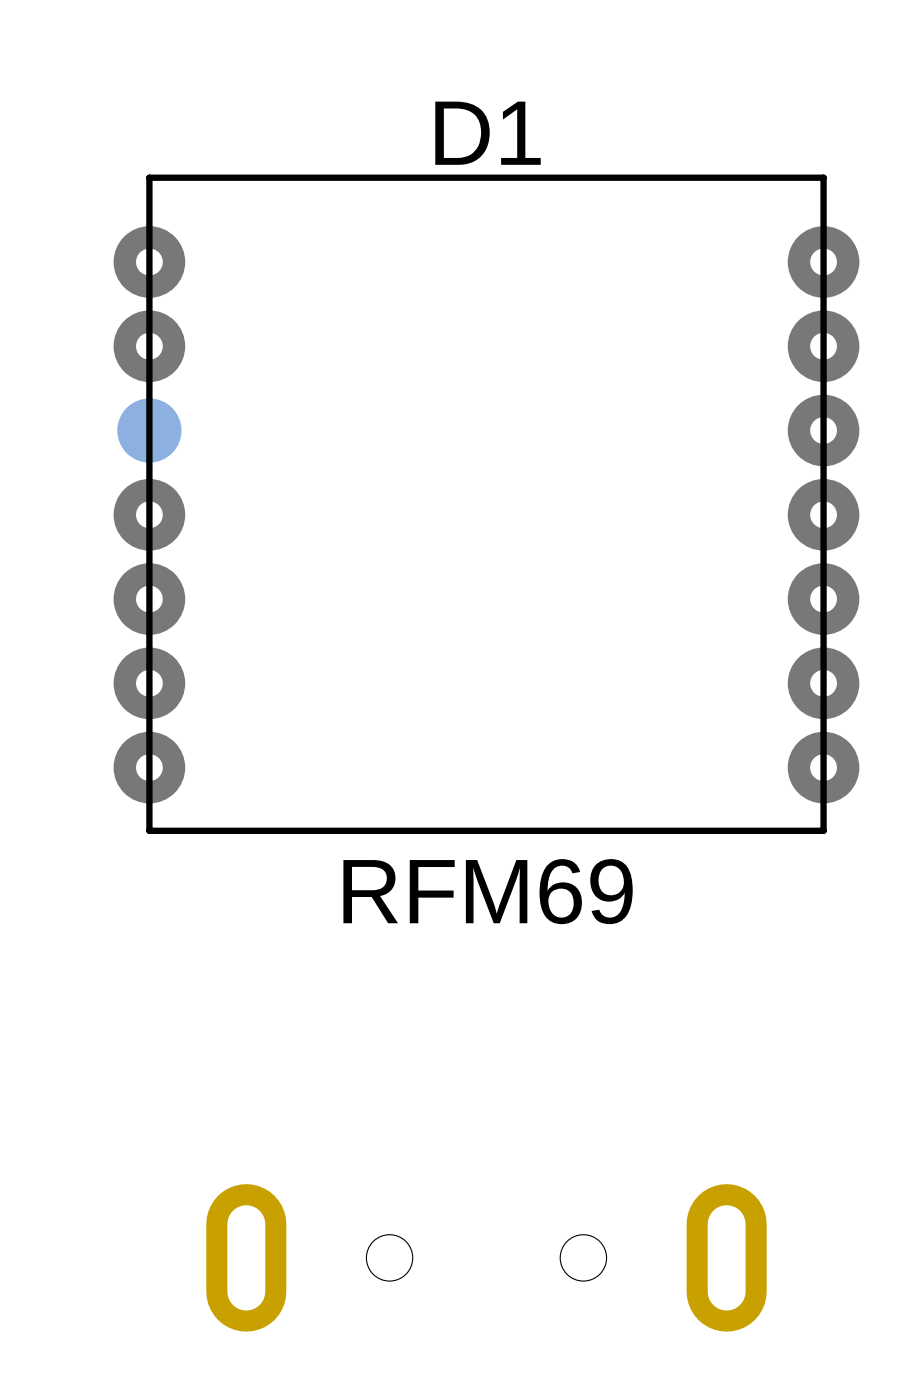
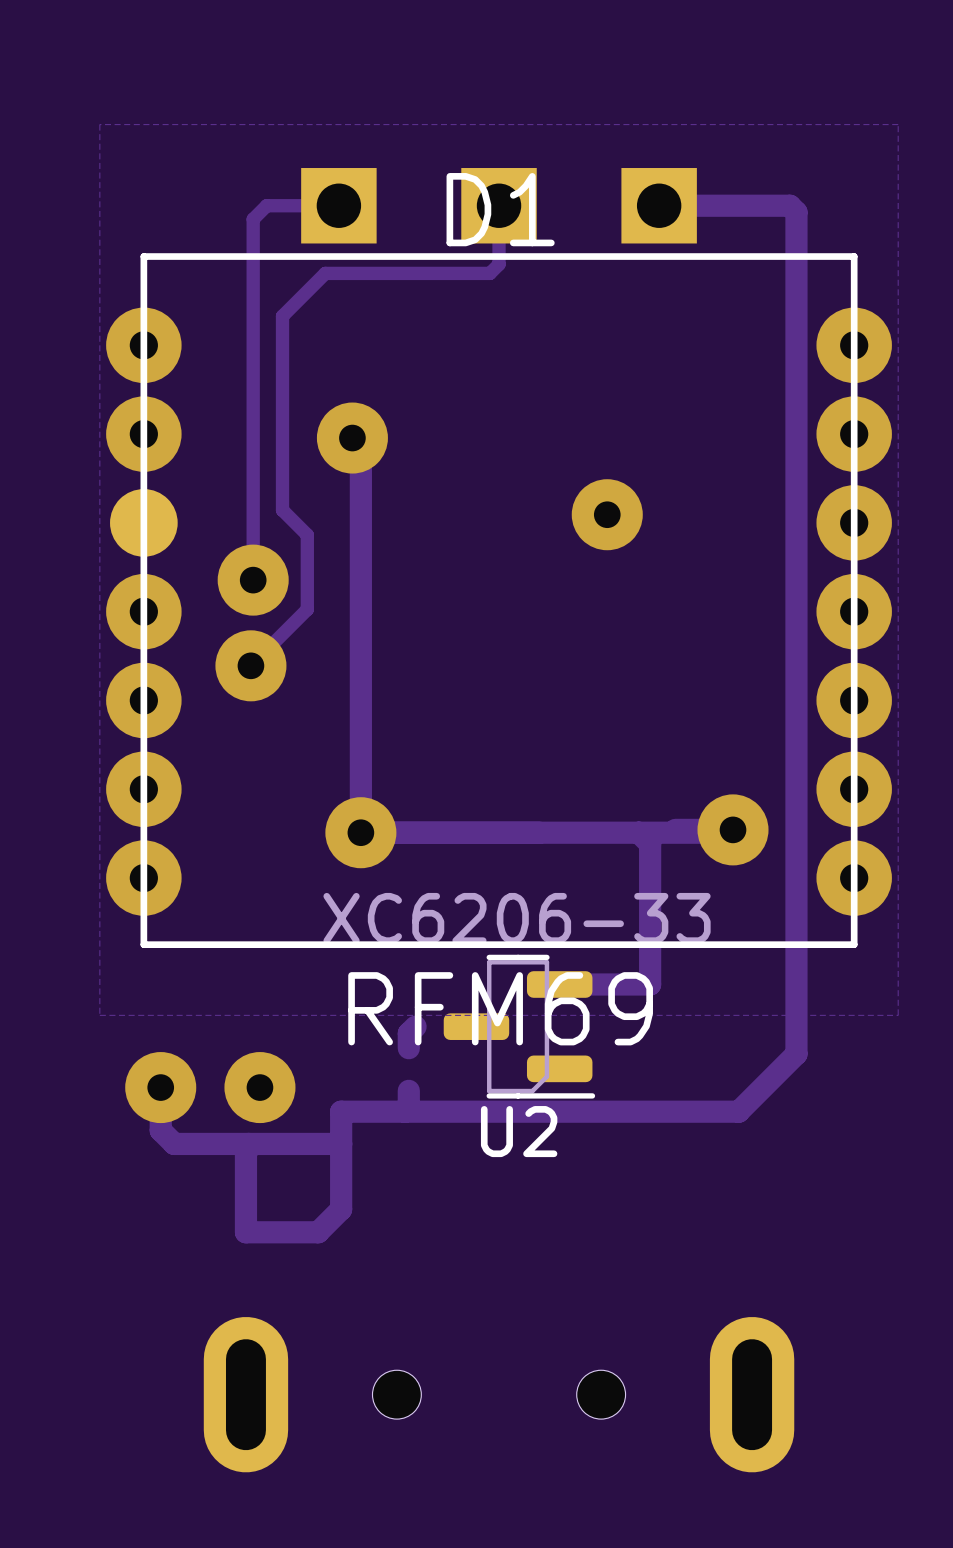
zone outline: none -> (898, 124) (898, 1015) (99, 1015) (99, 124) (898, 124)
track: none -> (338, 205) (266, 205) (253, 219) (253, 580)
part: none -> (338, 205)
track: none -> (499, 205) (499, 264) (490, 273) (325, 273) (282, 316) (282, 510) (307, 535) (307, 609) (250, 665) (275, 665)
part: none -> (499, 205)
track: none -> (659, 205) (789, 205) (796, 212) (796, 1053) (738, 1111) (341, 1111) (341, 1209) (318, 1232) (245, 1232) (245, 1151) (248, 1148) (248, 1143)
part: none -> (659, 205)
track: none -> (352, 438) (360, 446) (360, 832) (730, 832) (733, 829) (675, 829)
via: none -> (352, 438)
via: none -> (607, 514)
via: none -> (253, 580)
via: none -> (250, 665)
via: none -> (733, 829)
via: none -> (360, 832)
track: none -> (638, 832) (650, 843) (650, 984) (559, 984)
track: none -> (415, 1026) (408, 1033) (408, 1048)
U2: none -> XC6206-33 (519, 1026)
track: none -> (160, 1087) (160, 1130) (174, 1143) (341, 1143)
via: none -> (160, 1087)
via: none -> (259, 1087)
track: none -> (408, 1090) (408, 1107) (404, 1111)

